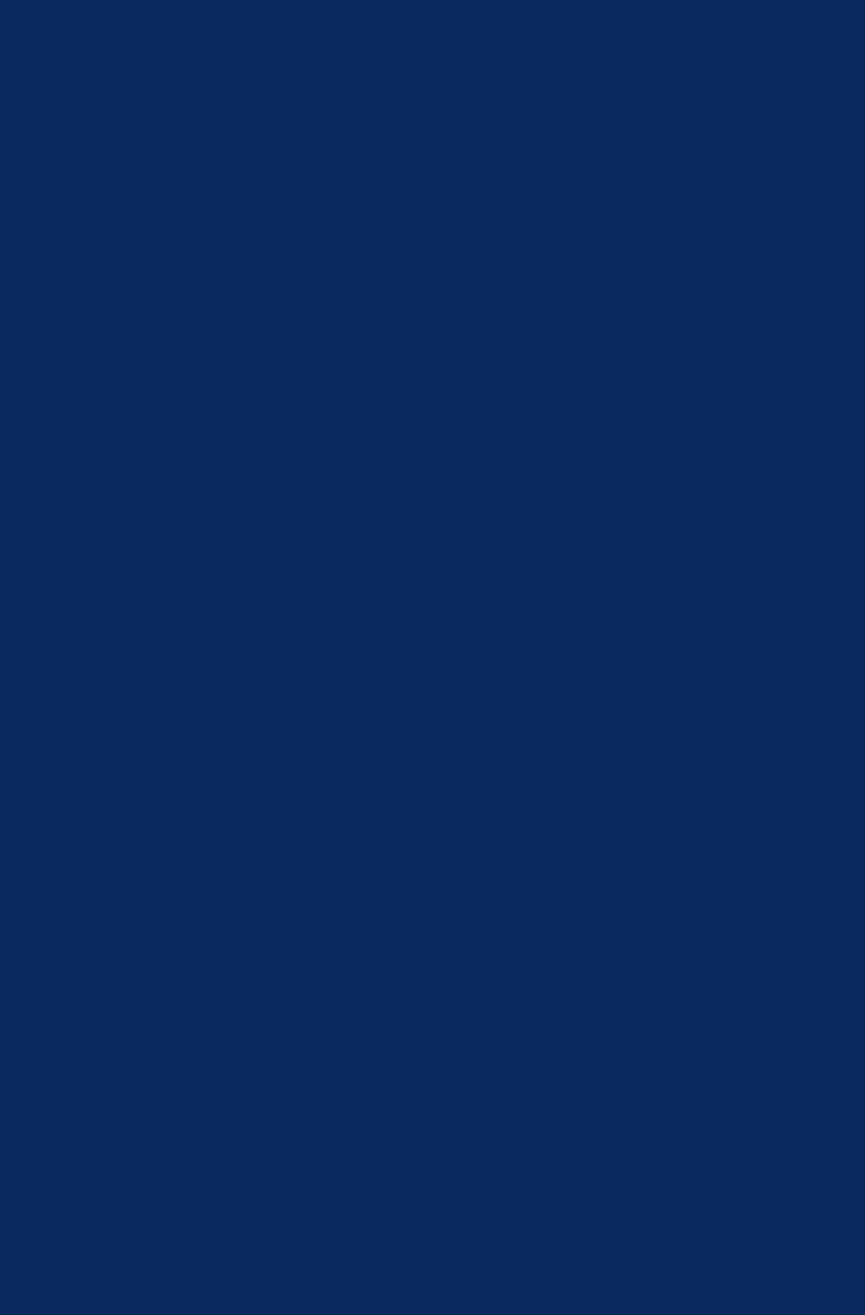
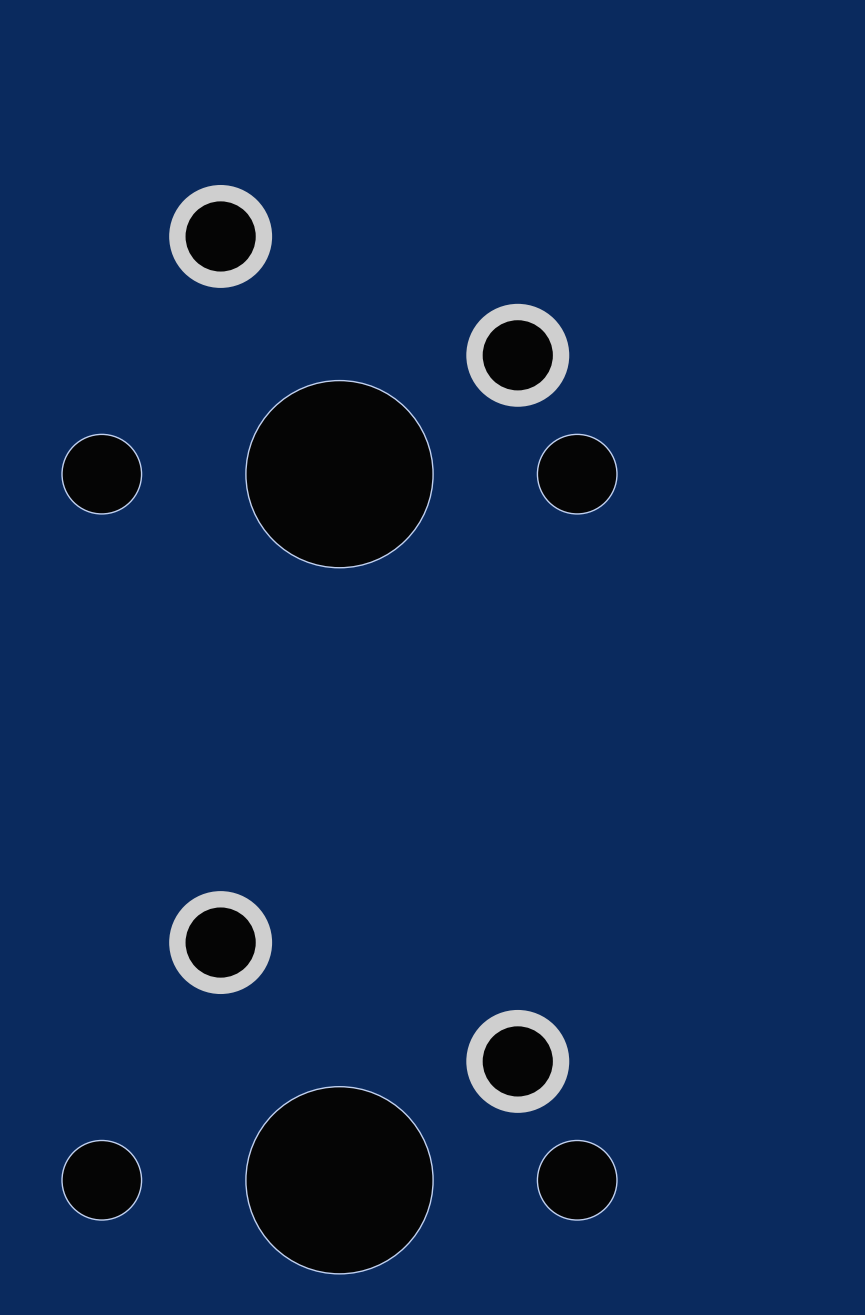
part: none -> (339, 376)
part: none -> (339, 1082)

